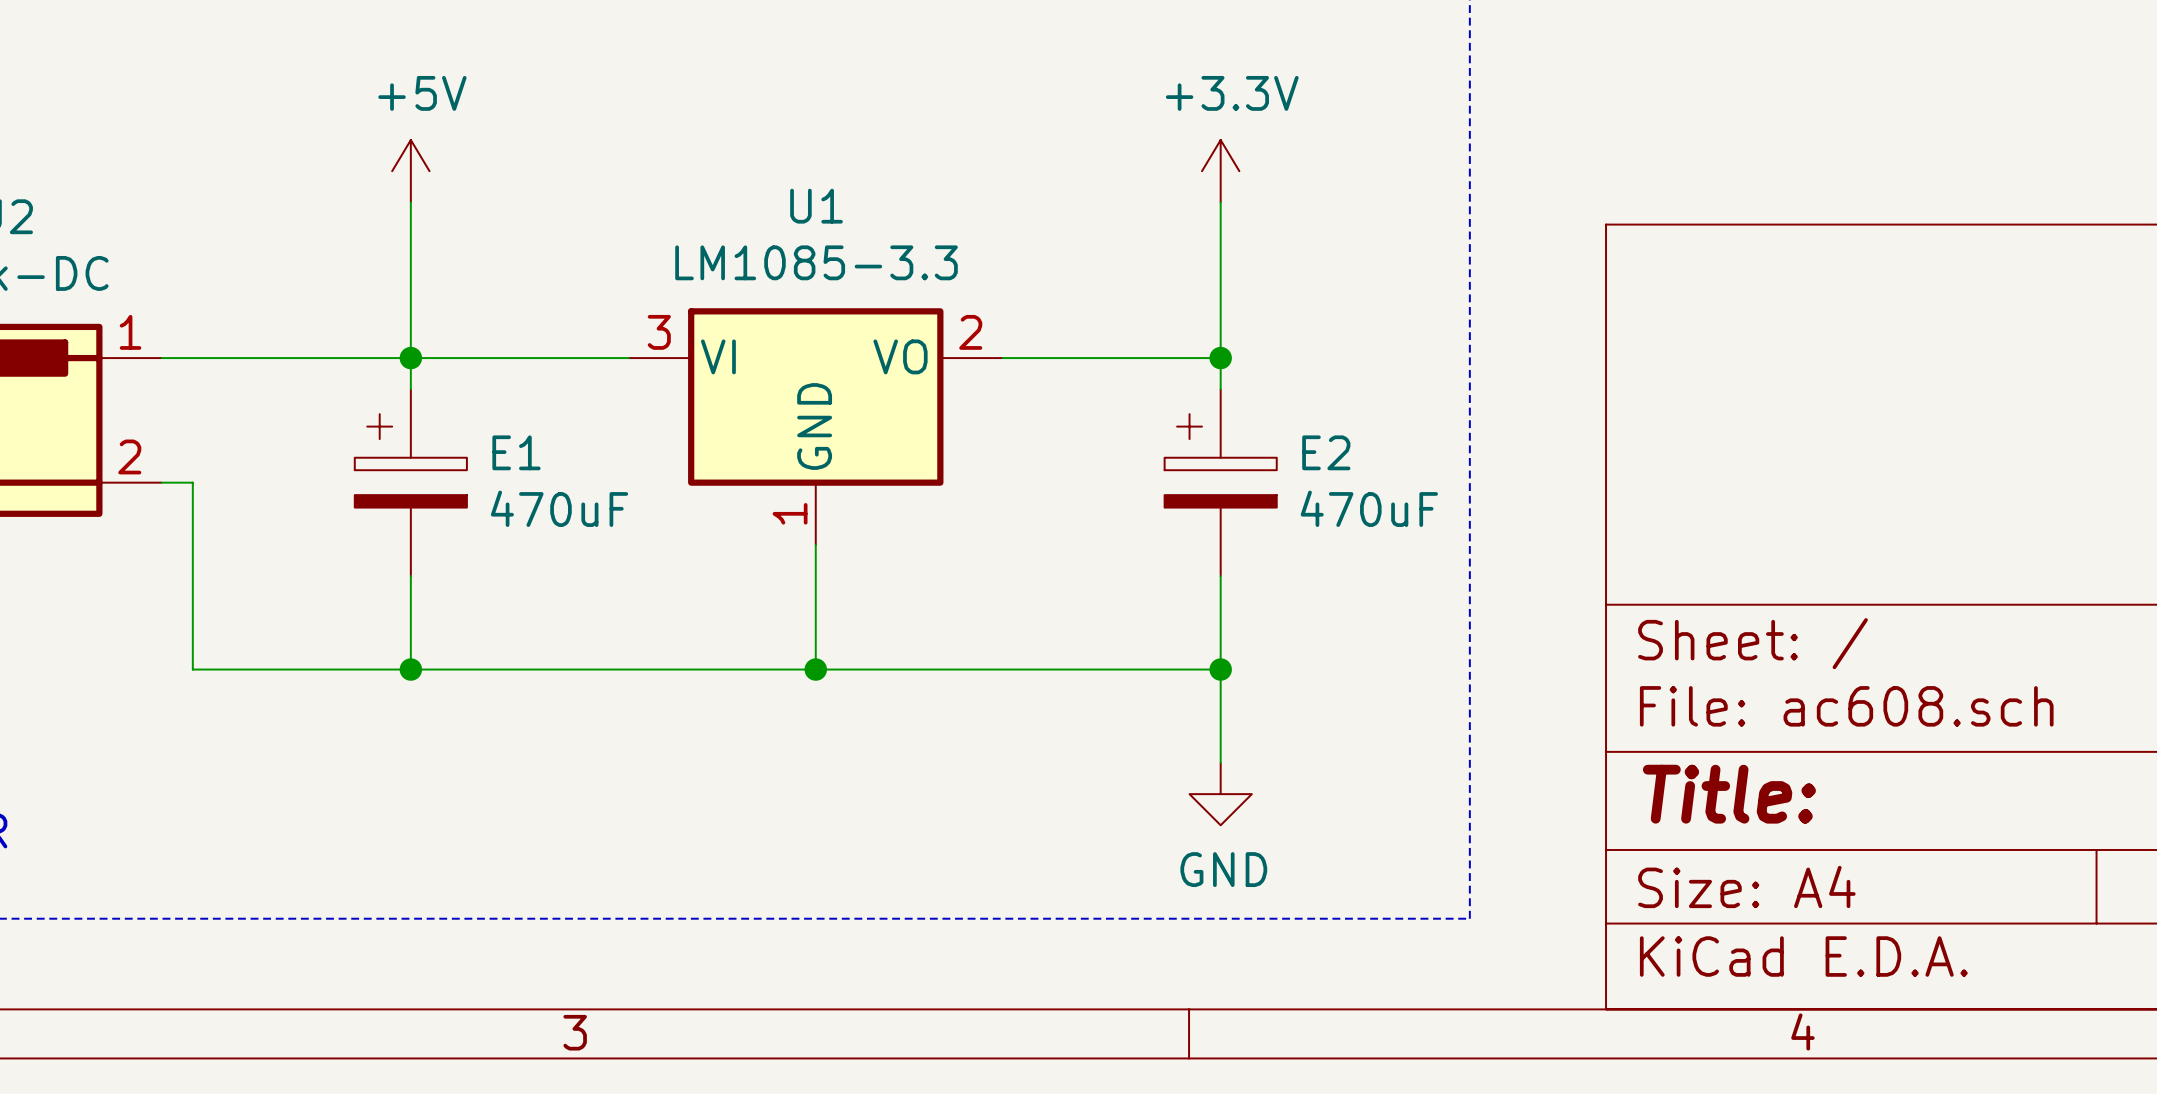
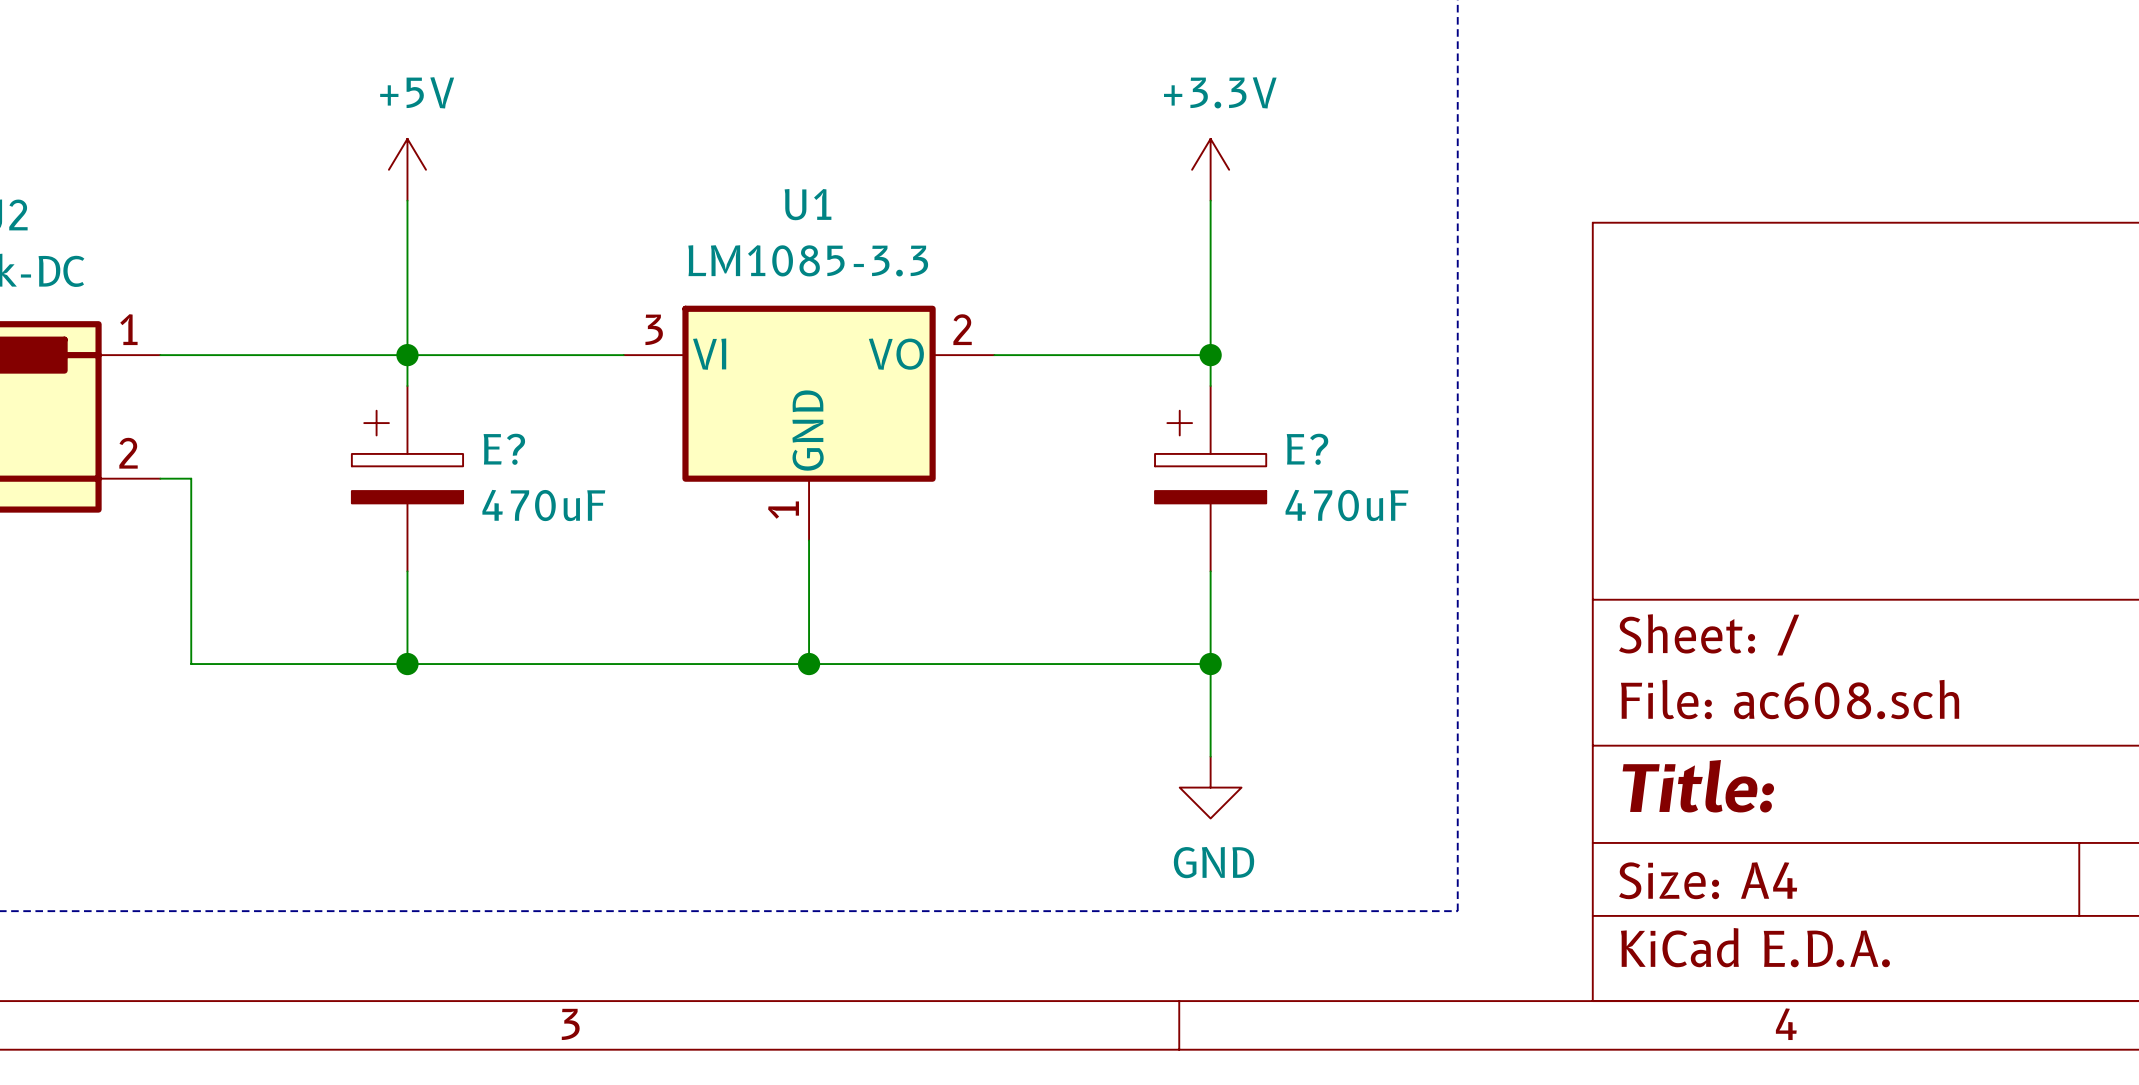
E1 name: E1 (516, 452) -> E? (504, 449)
E2 name: E2 (1326, 452) -> E? (1307, 449)

